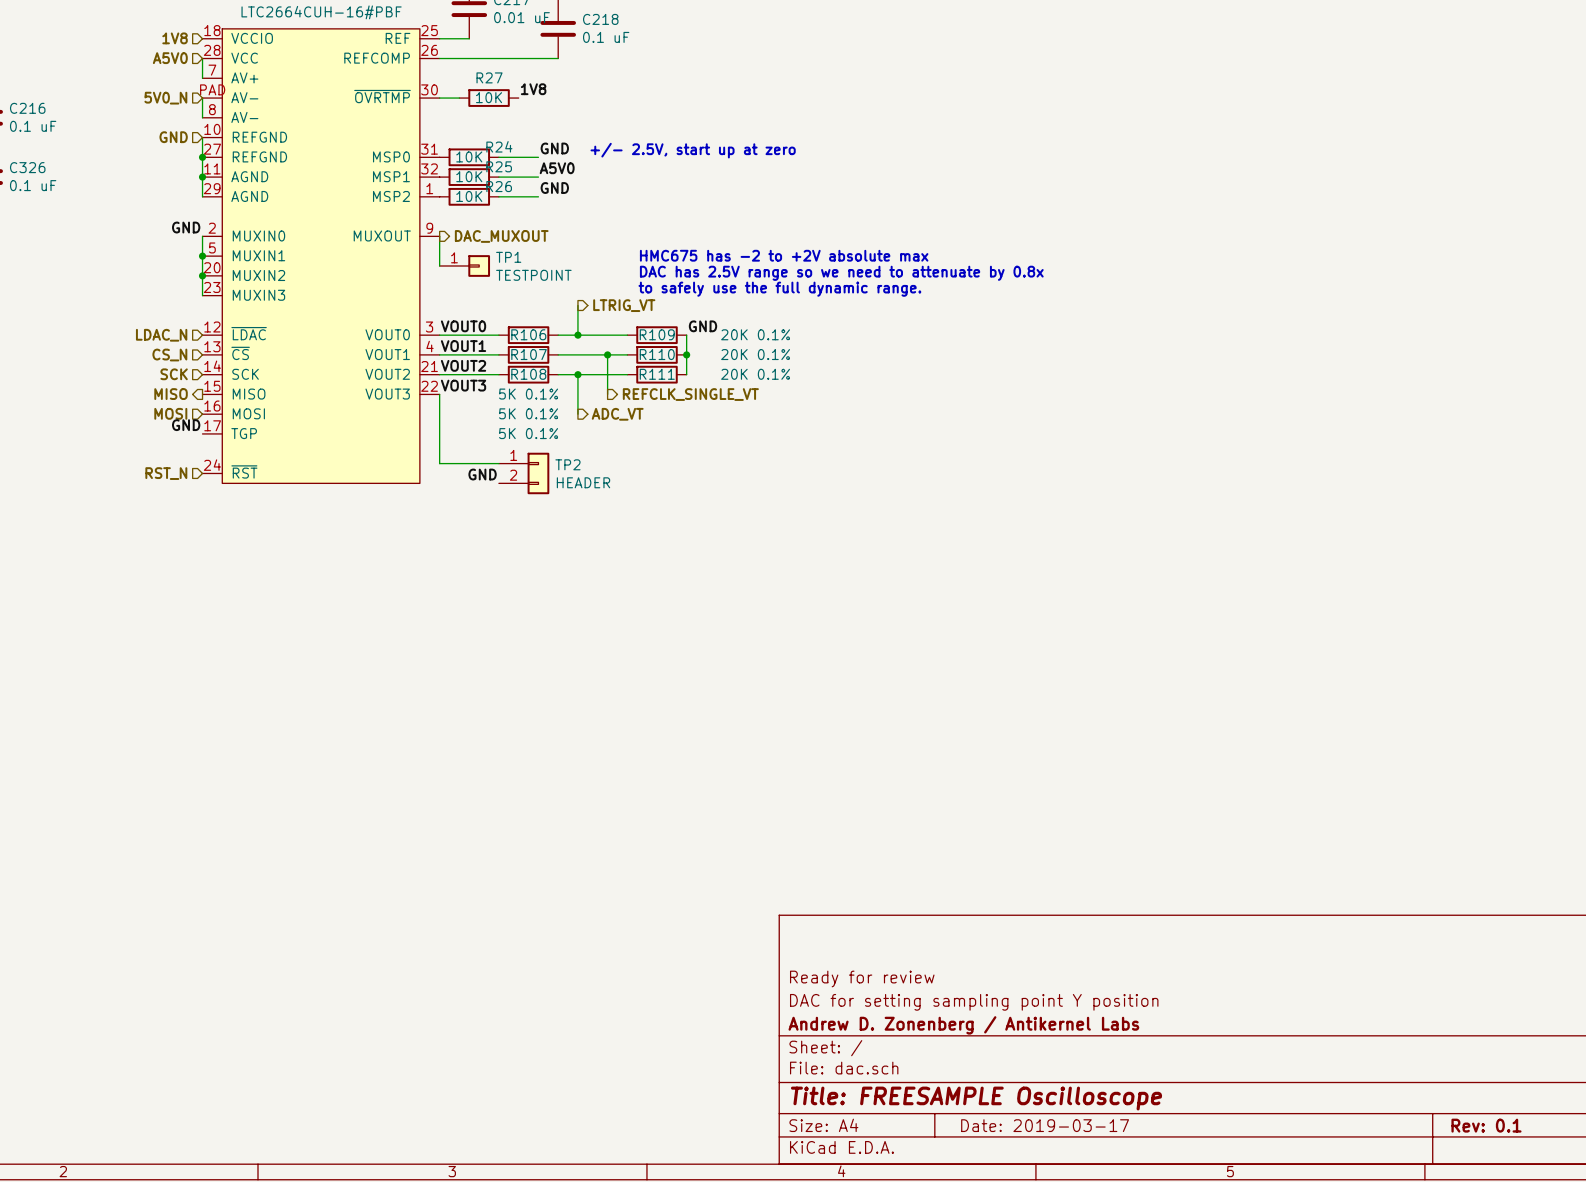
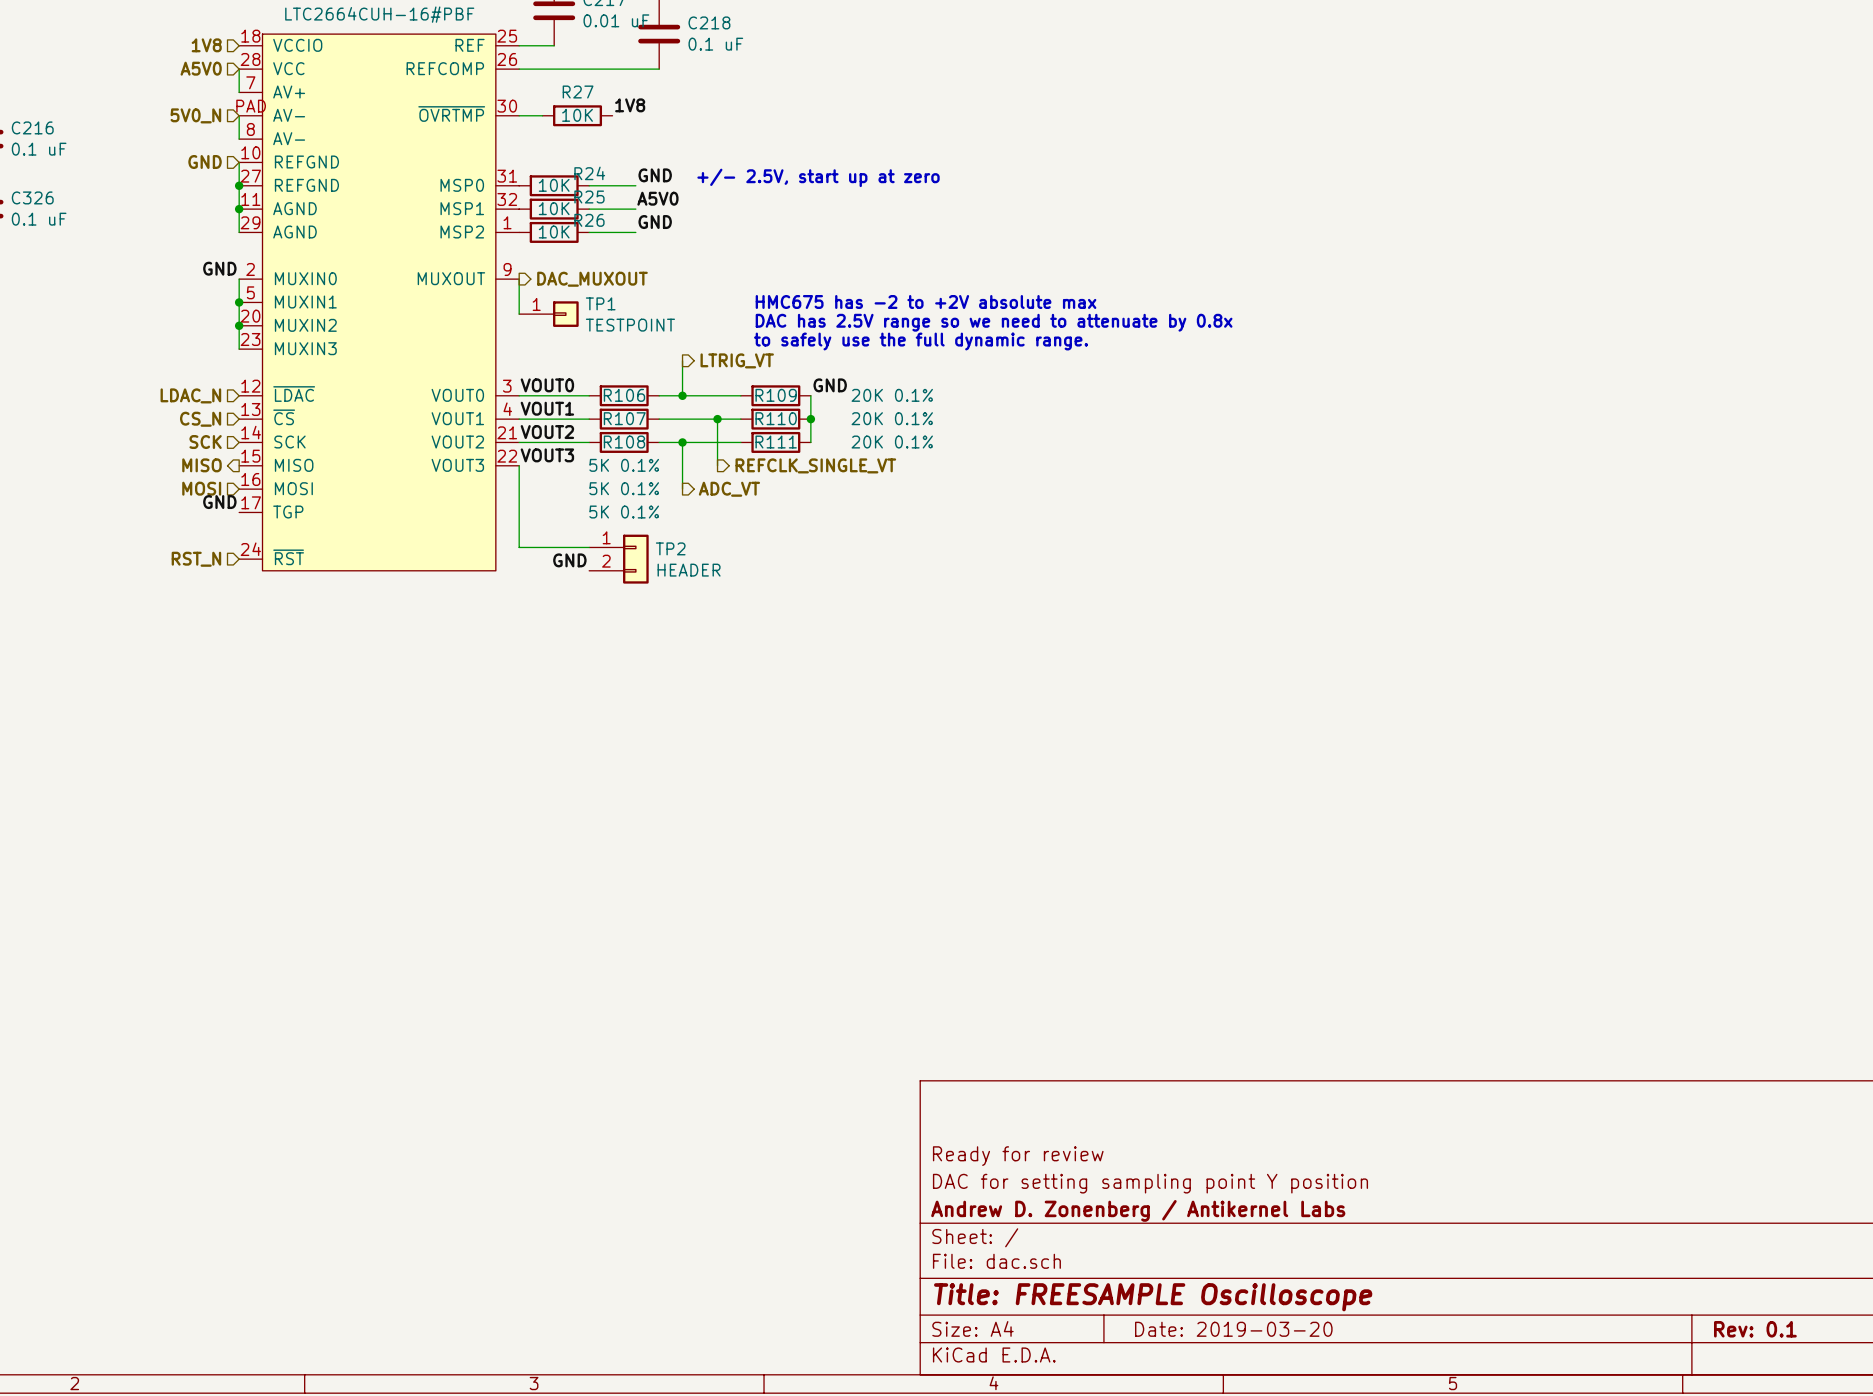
title block: Date: 2019-03-17 (1045, 1125) -> Date: 2019-03-20 (1233, 1329)

